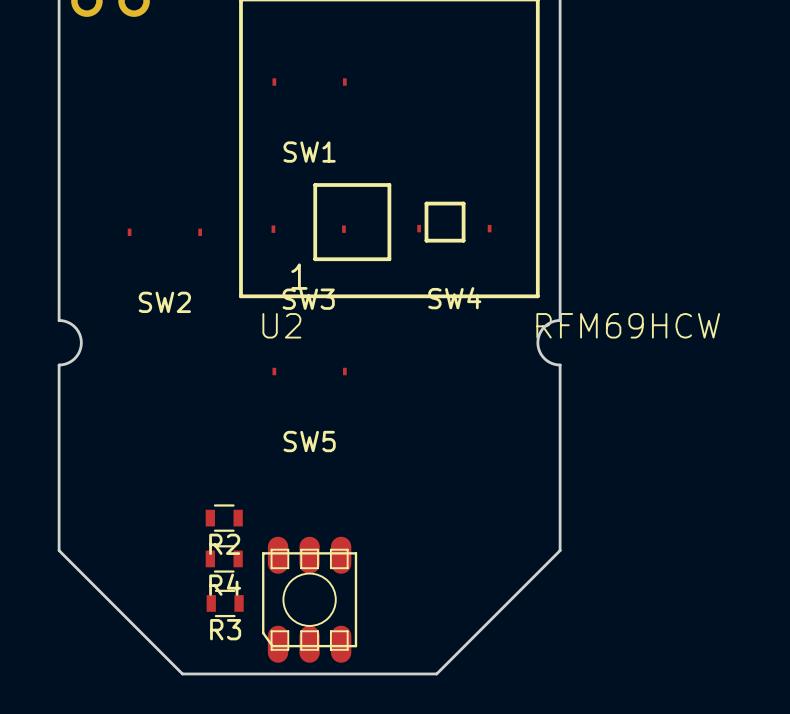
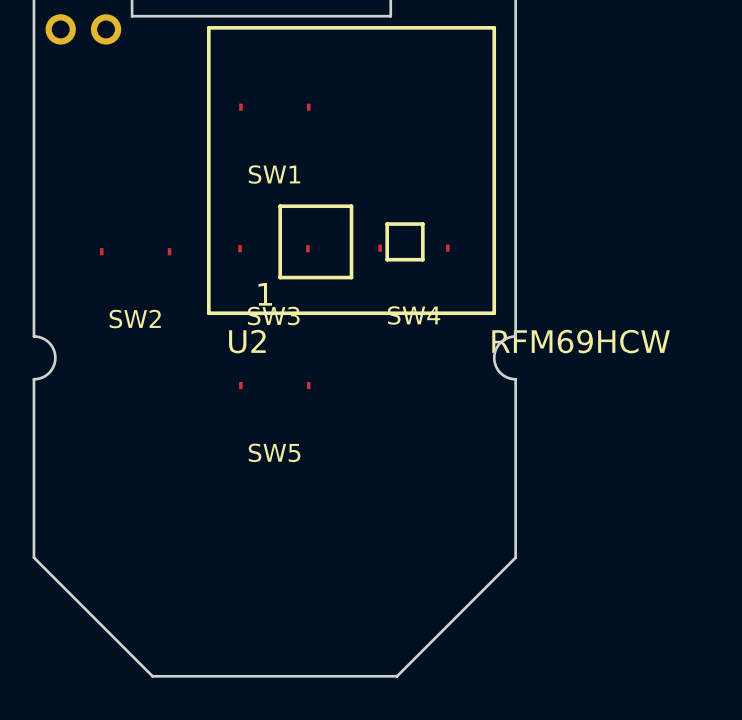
R2: (224, 518) -> none
R4: (224, 558) -> none
part: (309, 599) -> none
R3: (225, 603) -> none

